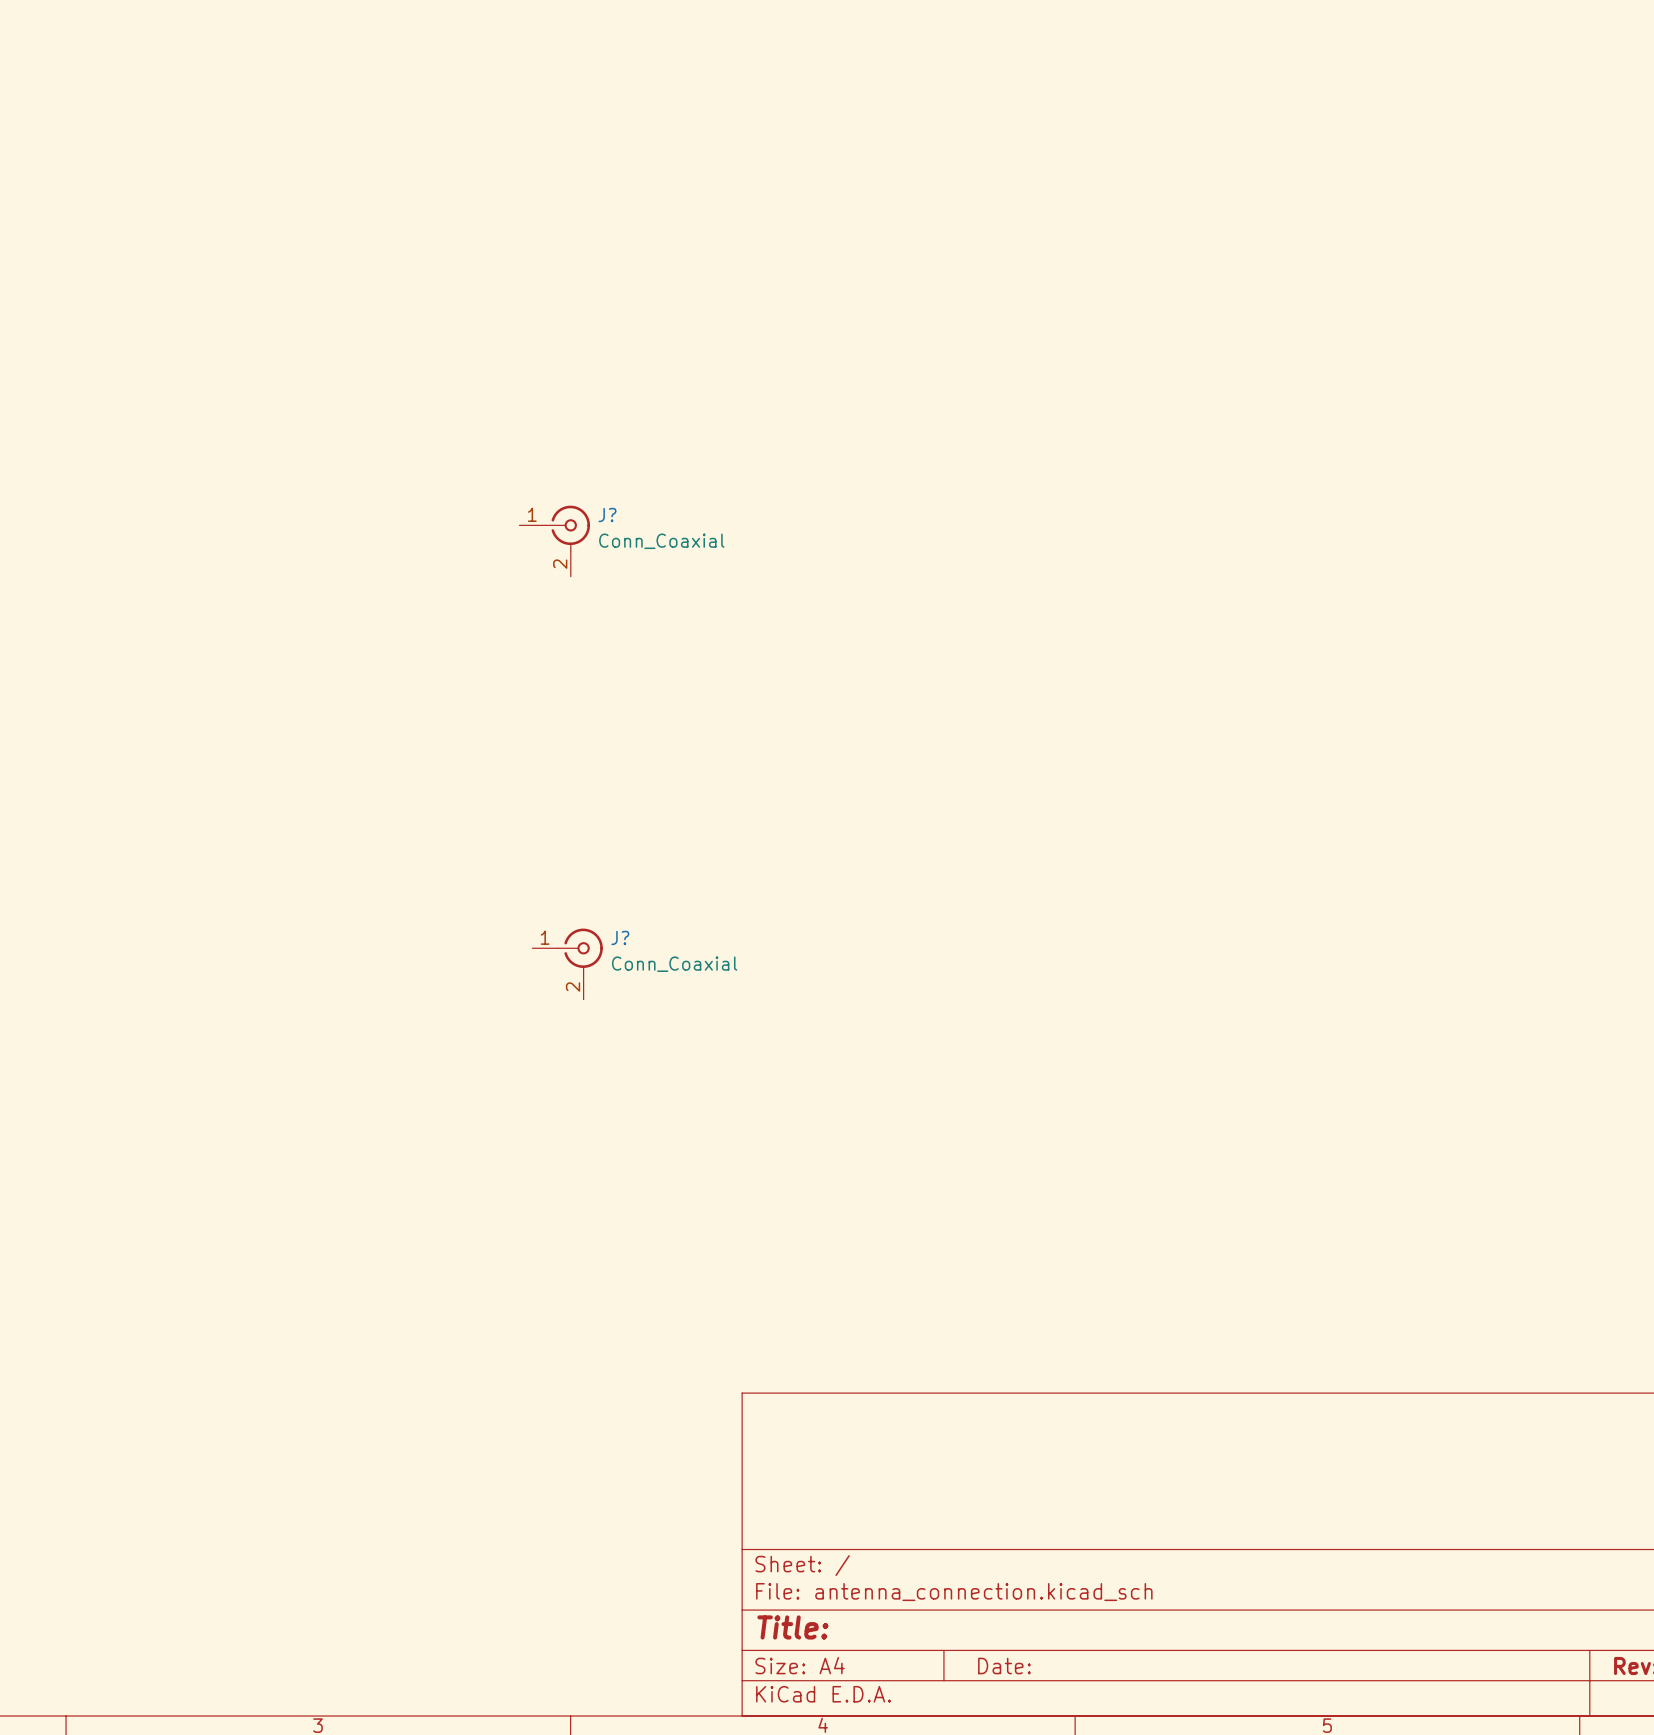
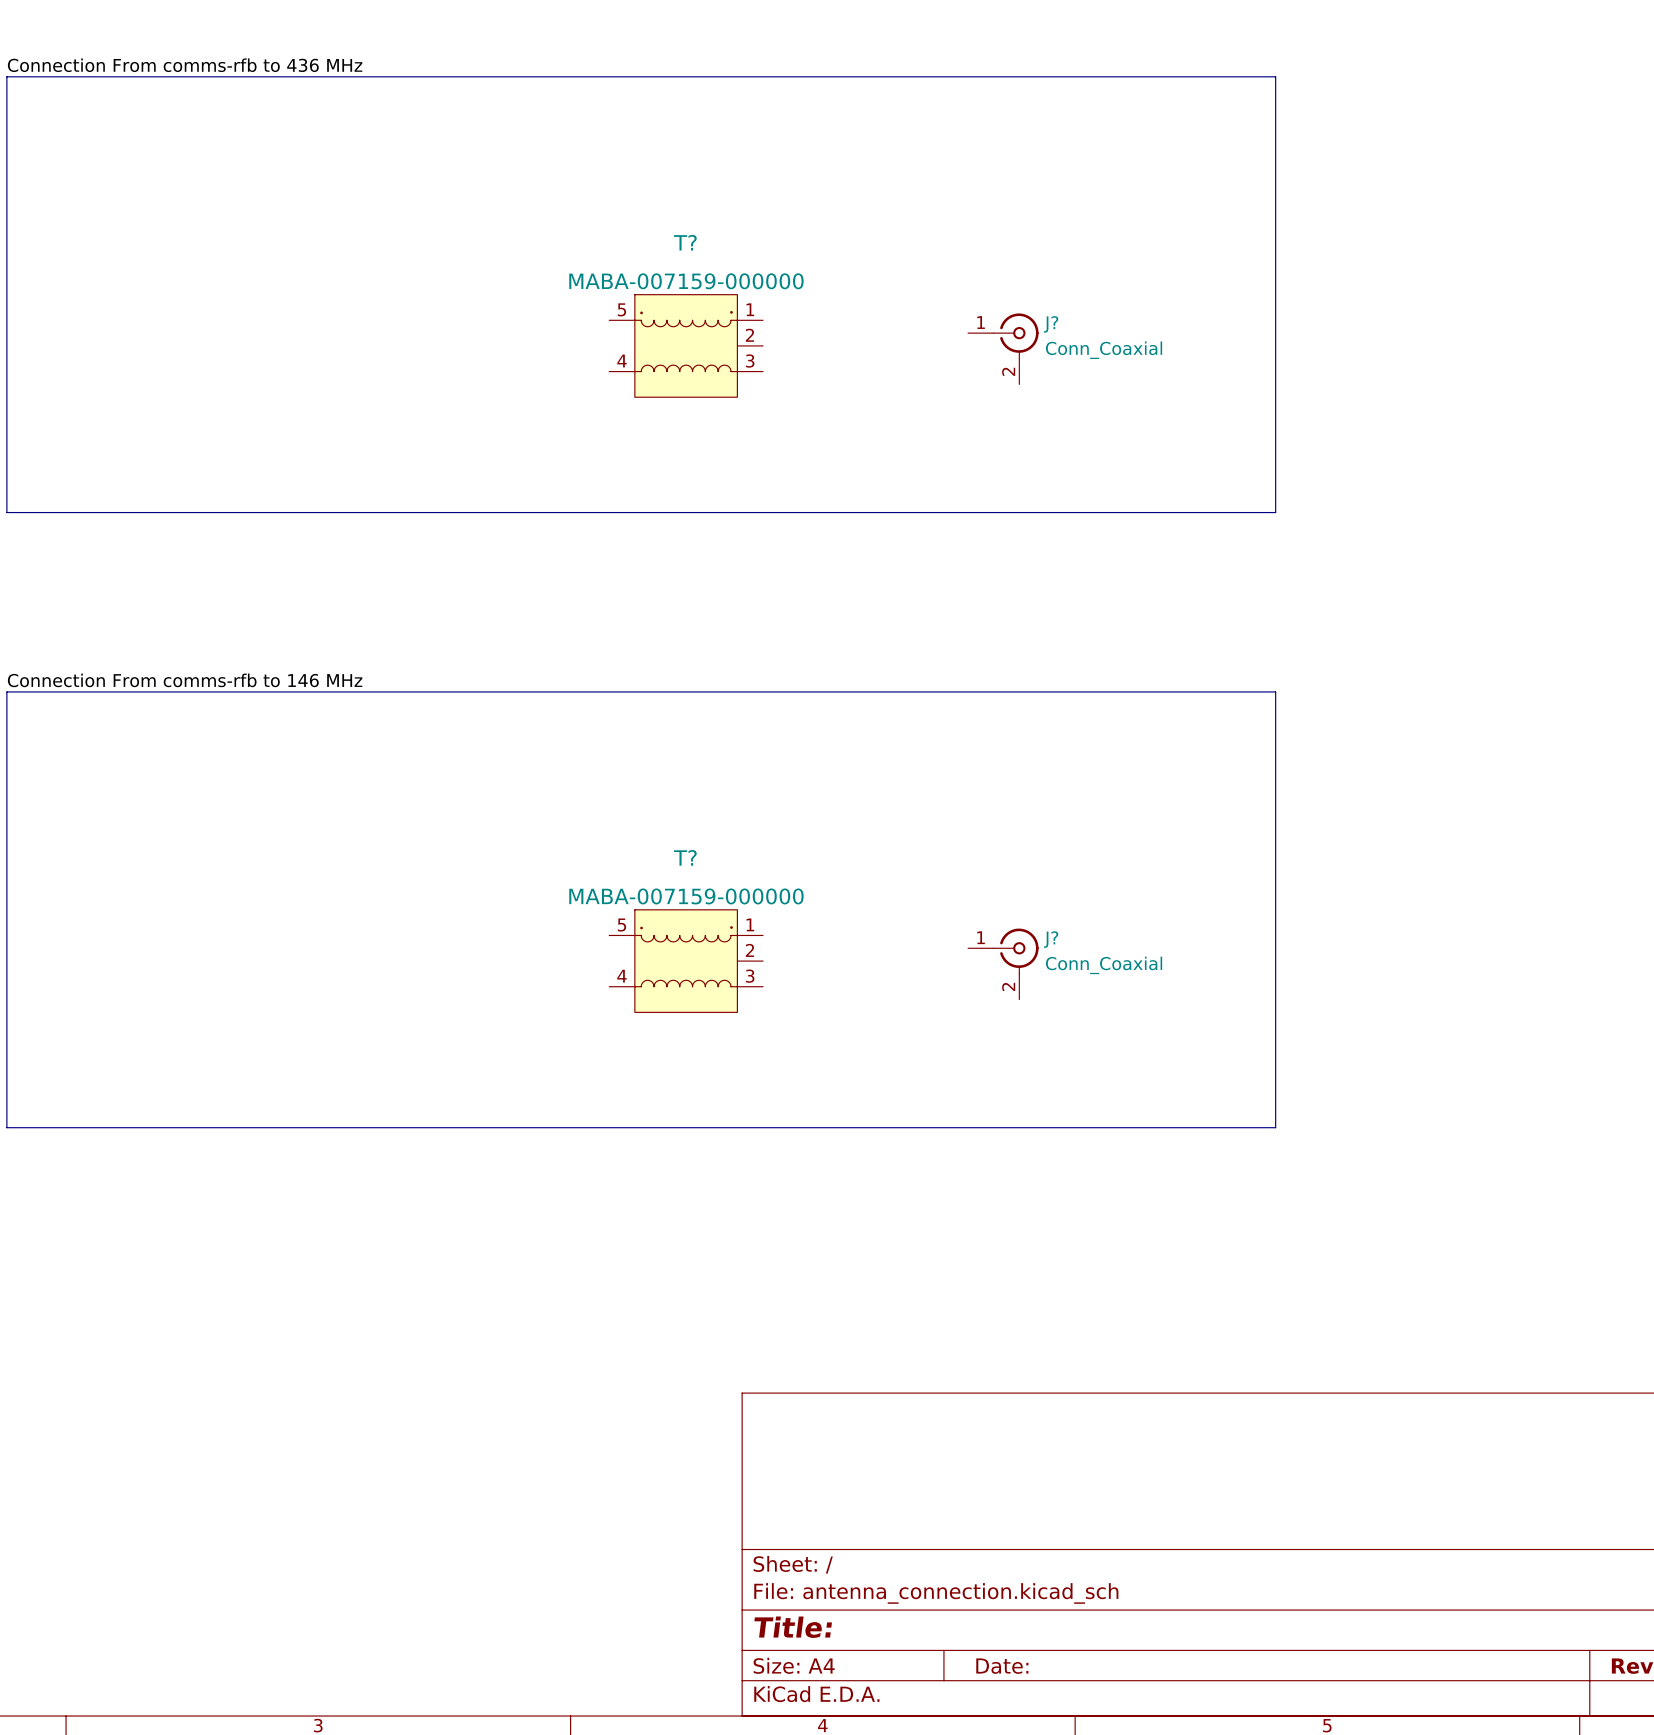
label: none -> Connection From comms-rfb to 436 MHz (185, 65)
line: none -> (6, 76) (1275, 76) (1275, 512) (6, 512) (6, 76)
T?: none -> MABA-007159-000000 (686, 345)
J?: none -> Conn_Coaxial (1003, 348)
J?: Conn_Coaxial (554, 541) -> none
label: none -> Connection From comms-rfb to 146 MHz (185, 680)
line: none -> (6, 691) (1275, 691) (1275, 1127) (6, 1127) (6, 691)
T?: none -> MABA-007159-000000 (686, 961)
J?: Conn_Coaxial (567, 964) -> none
J?: none -> Conn_Coaxial (1003, 964)

